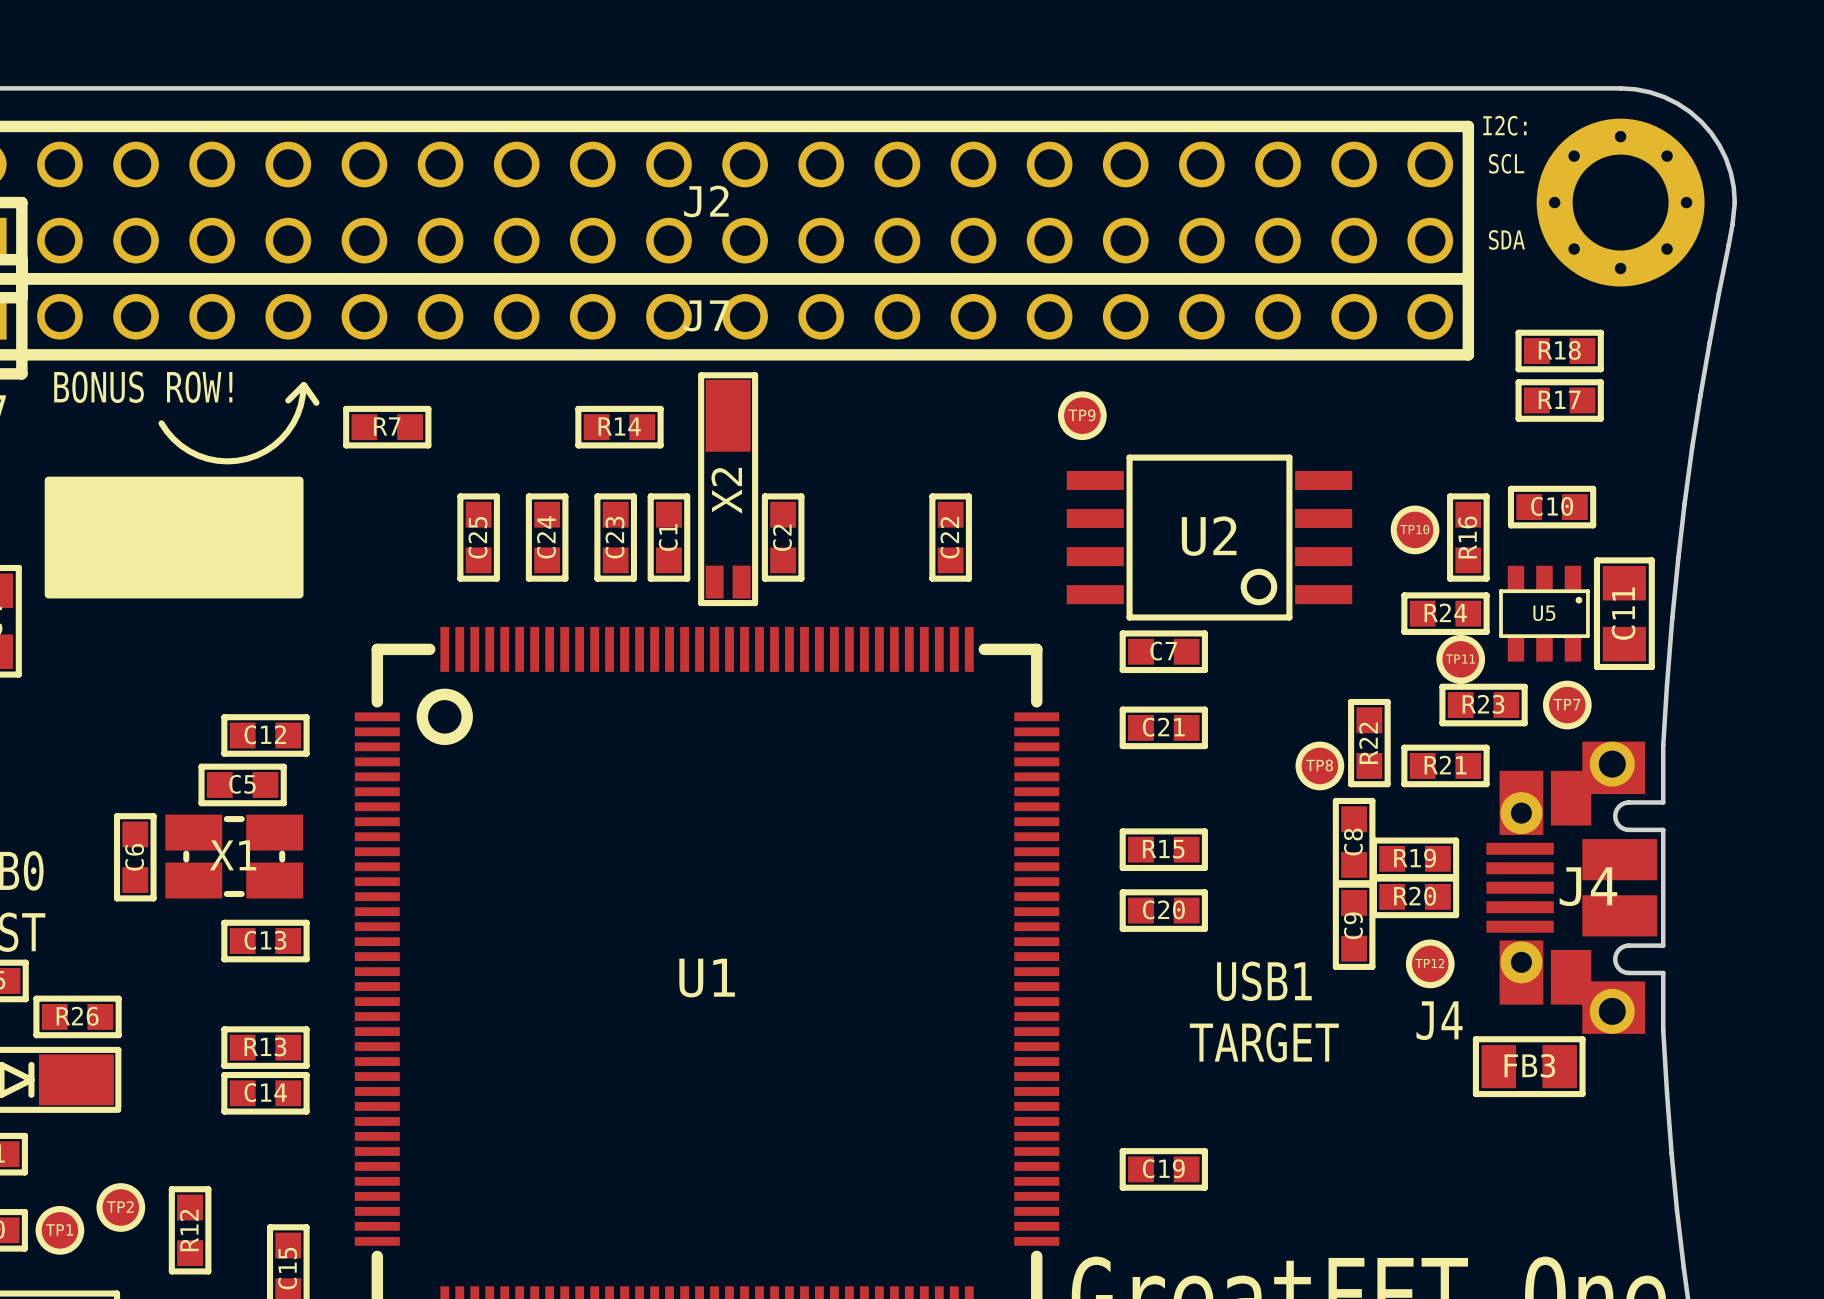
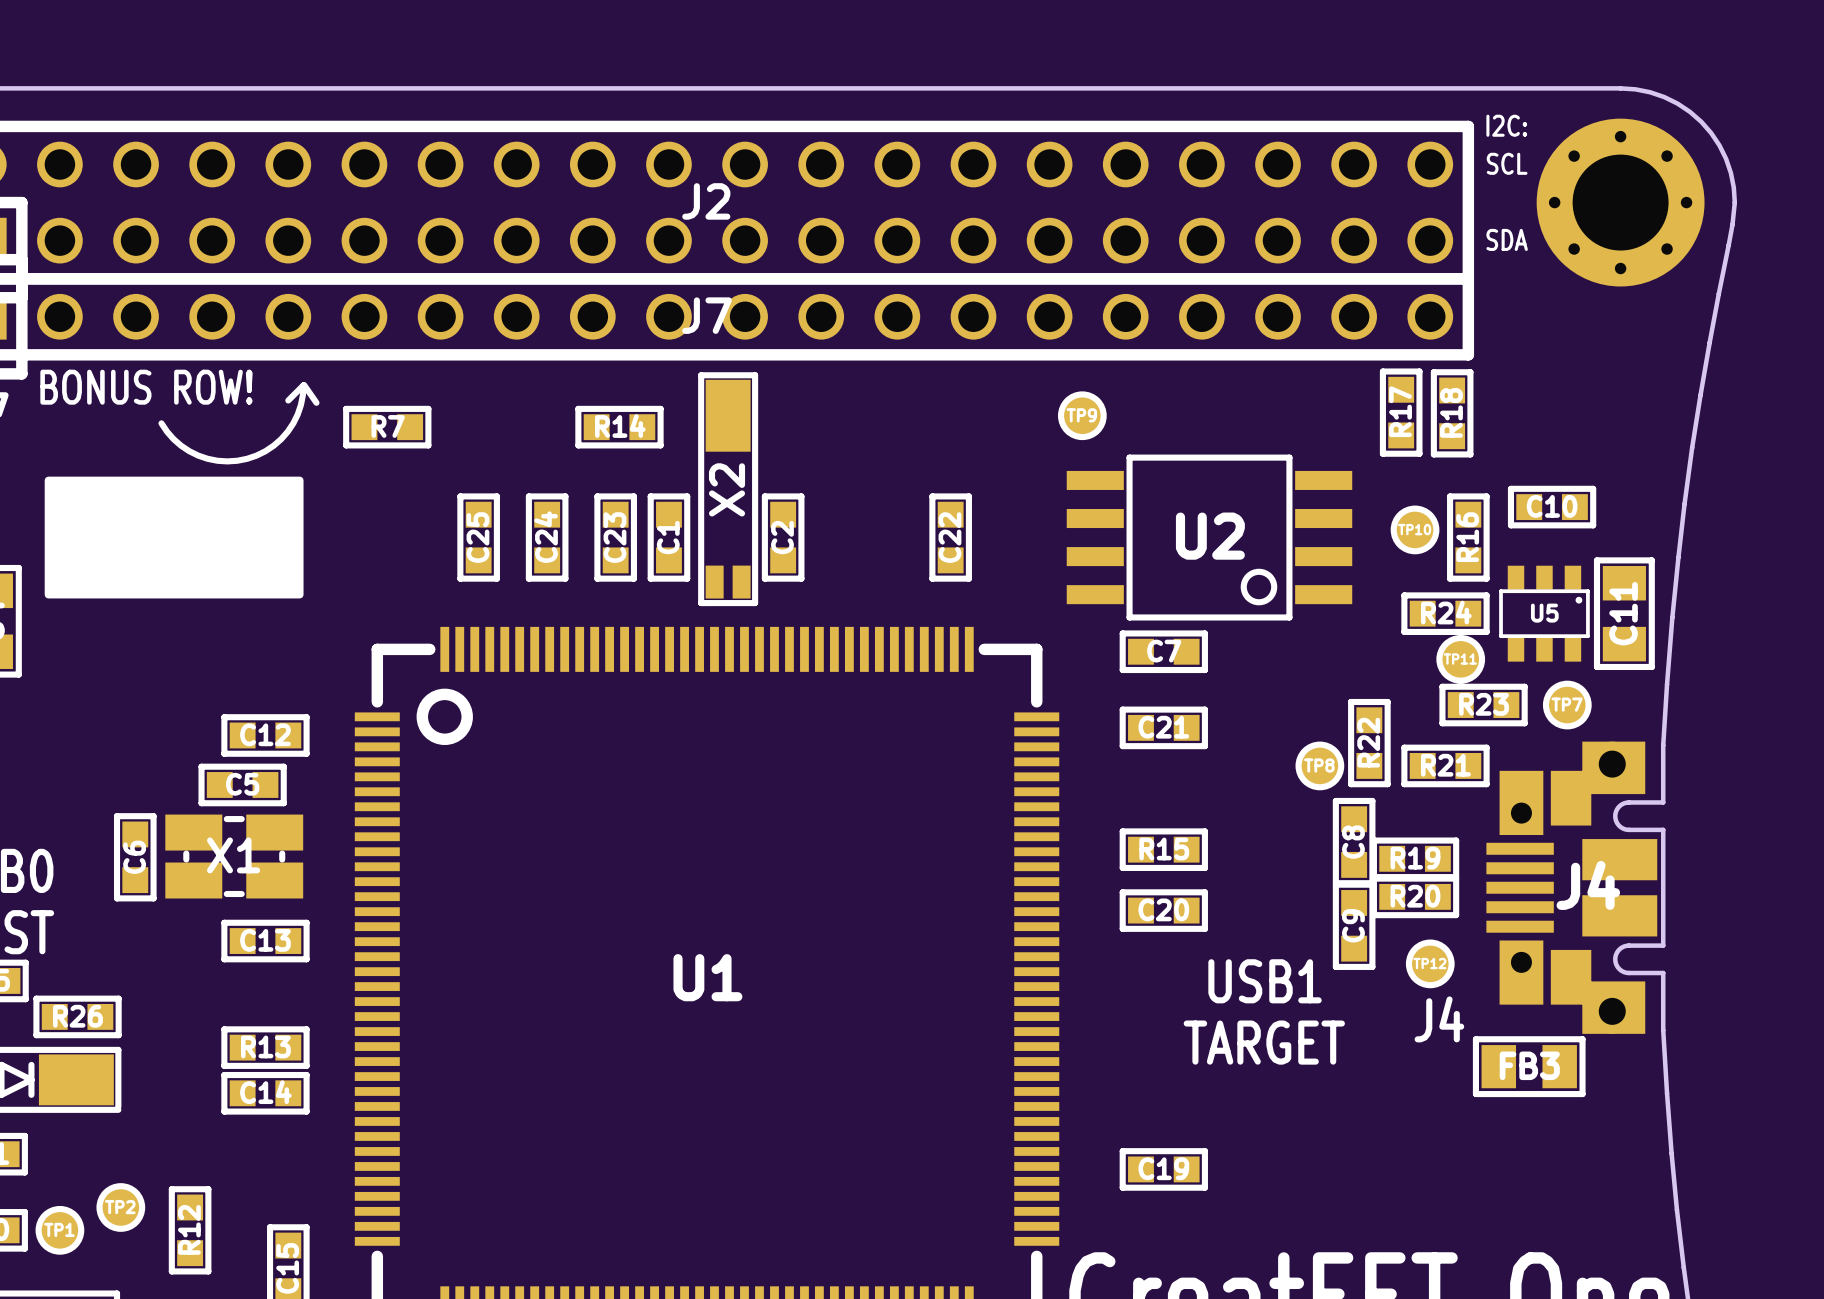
R18 rotation: 0° (1559, 351) -> 90° clockwise (1452, 413)
R18 position: (1559, 351) -> (1452, 413)
R17 rotation: 0° (1559, 400) -> 90° clockwise (1401, 412)
R17 position: (1559, 400) -> (1401, 412)

